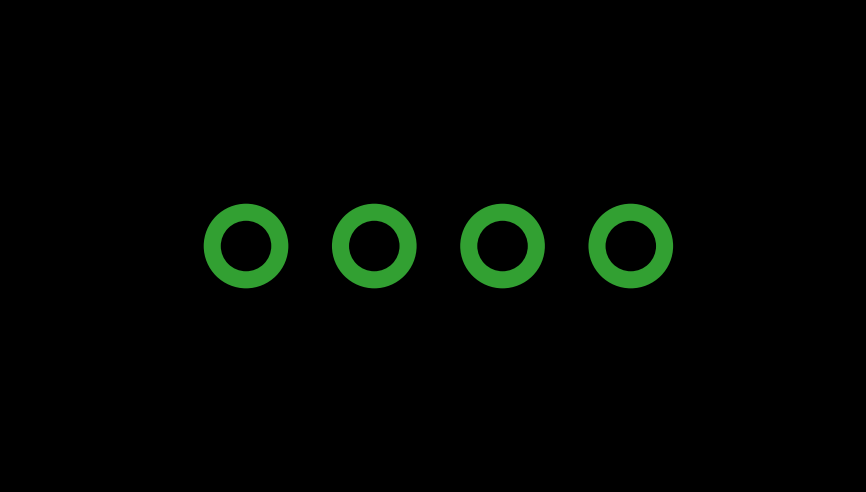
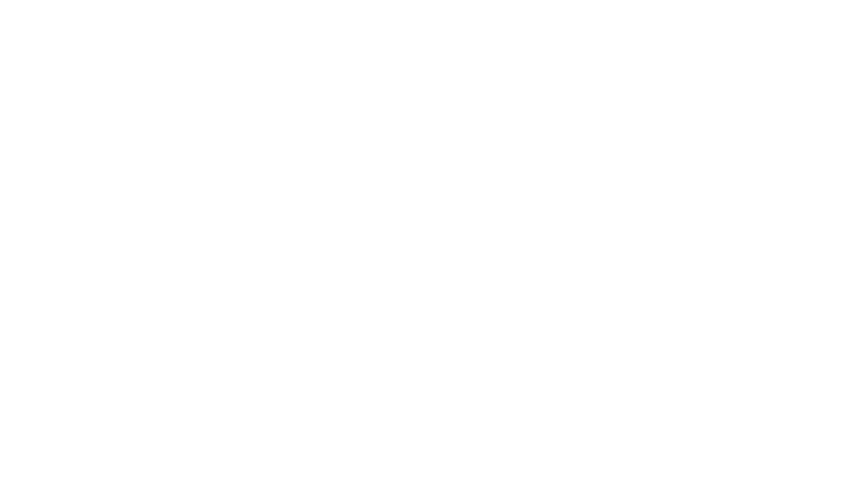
part: (438, 246) -> none

